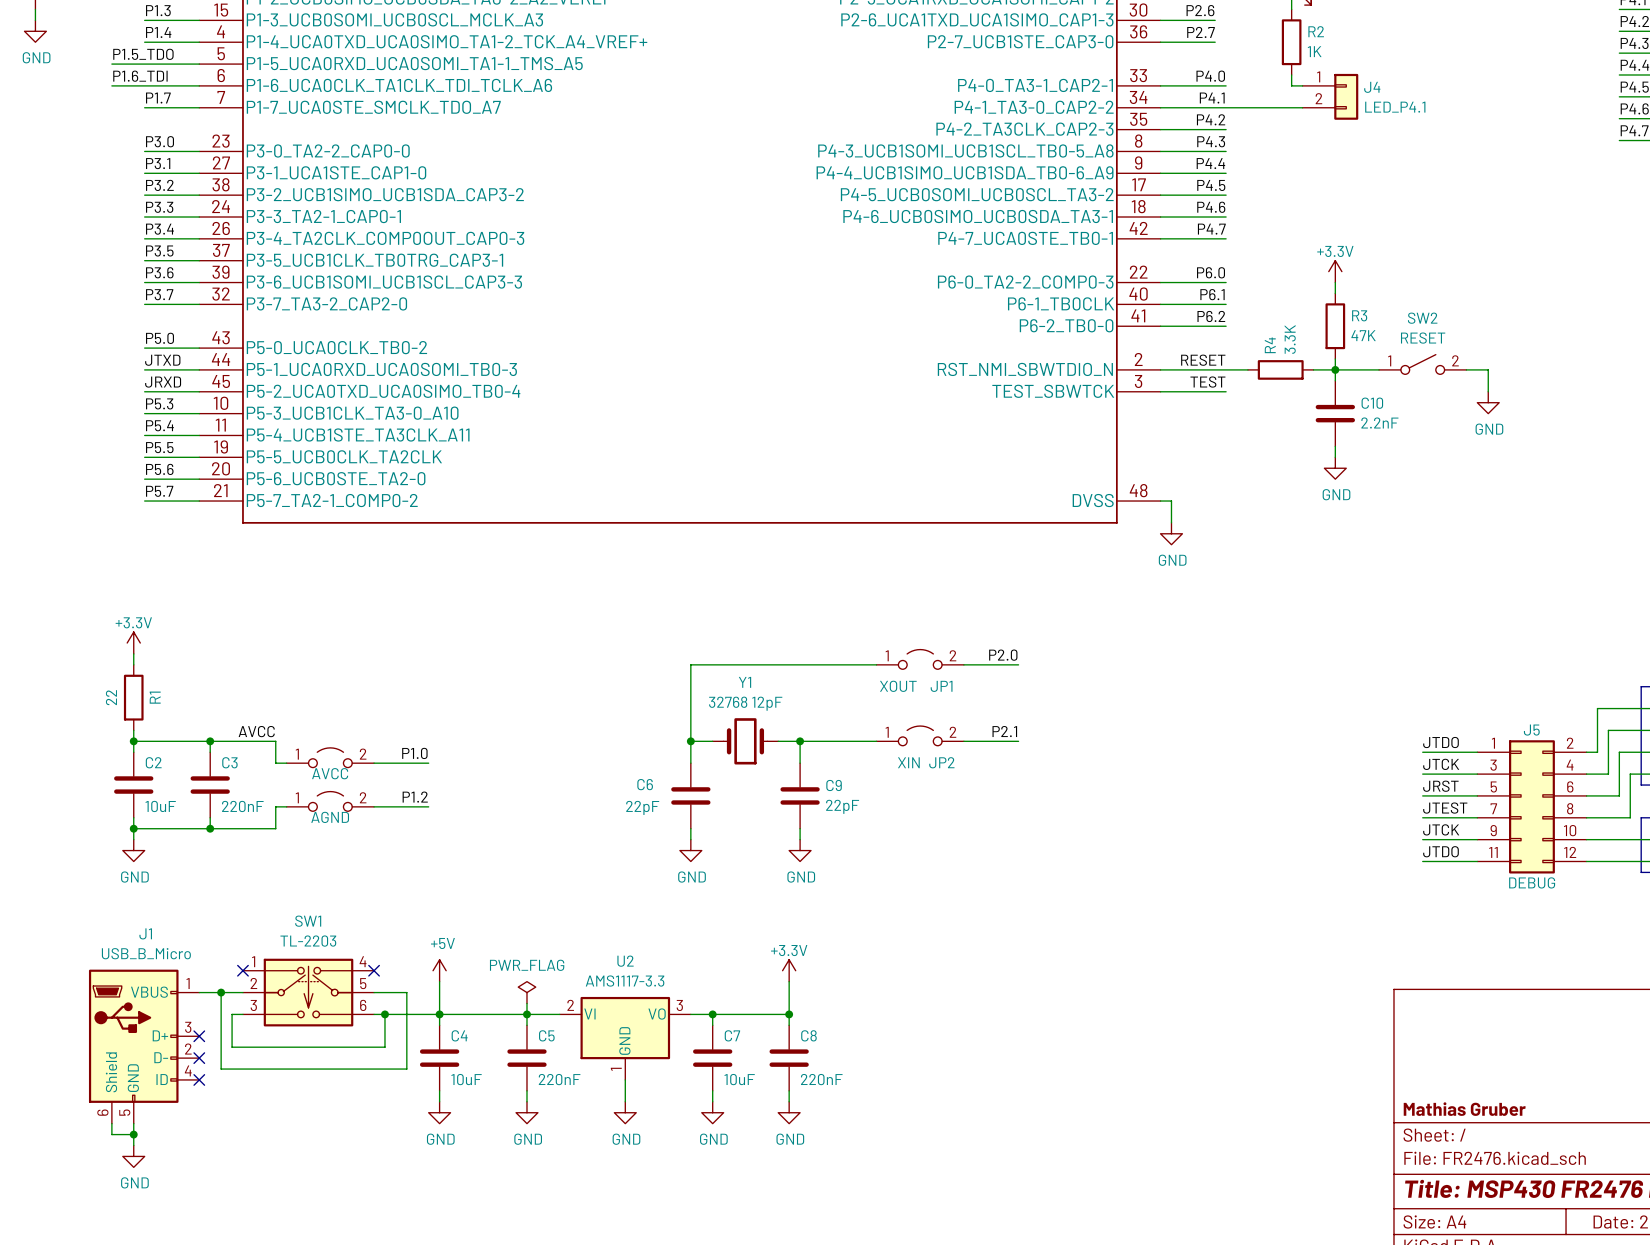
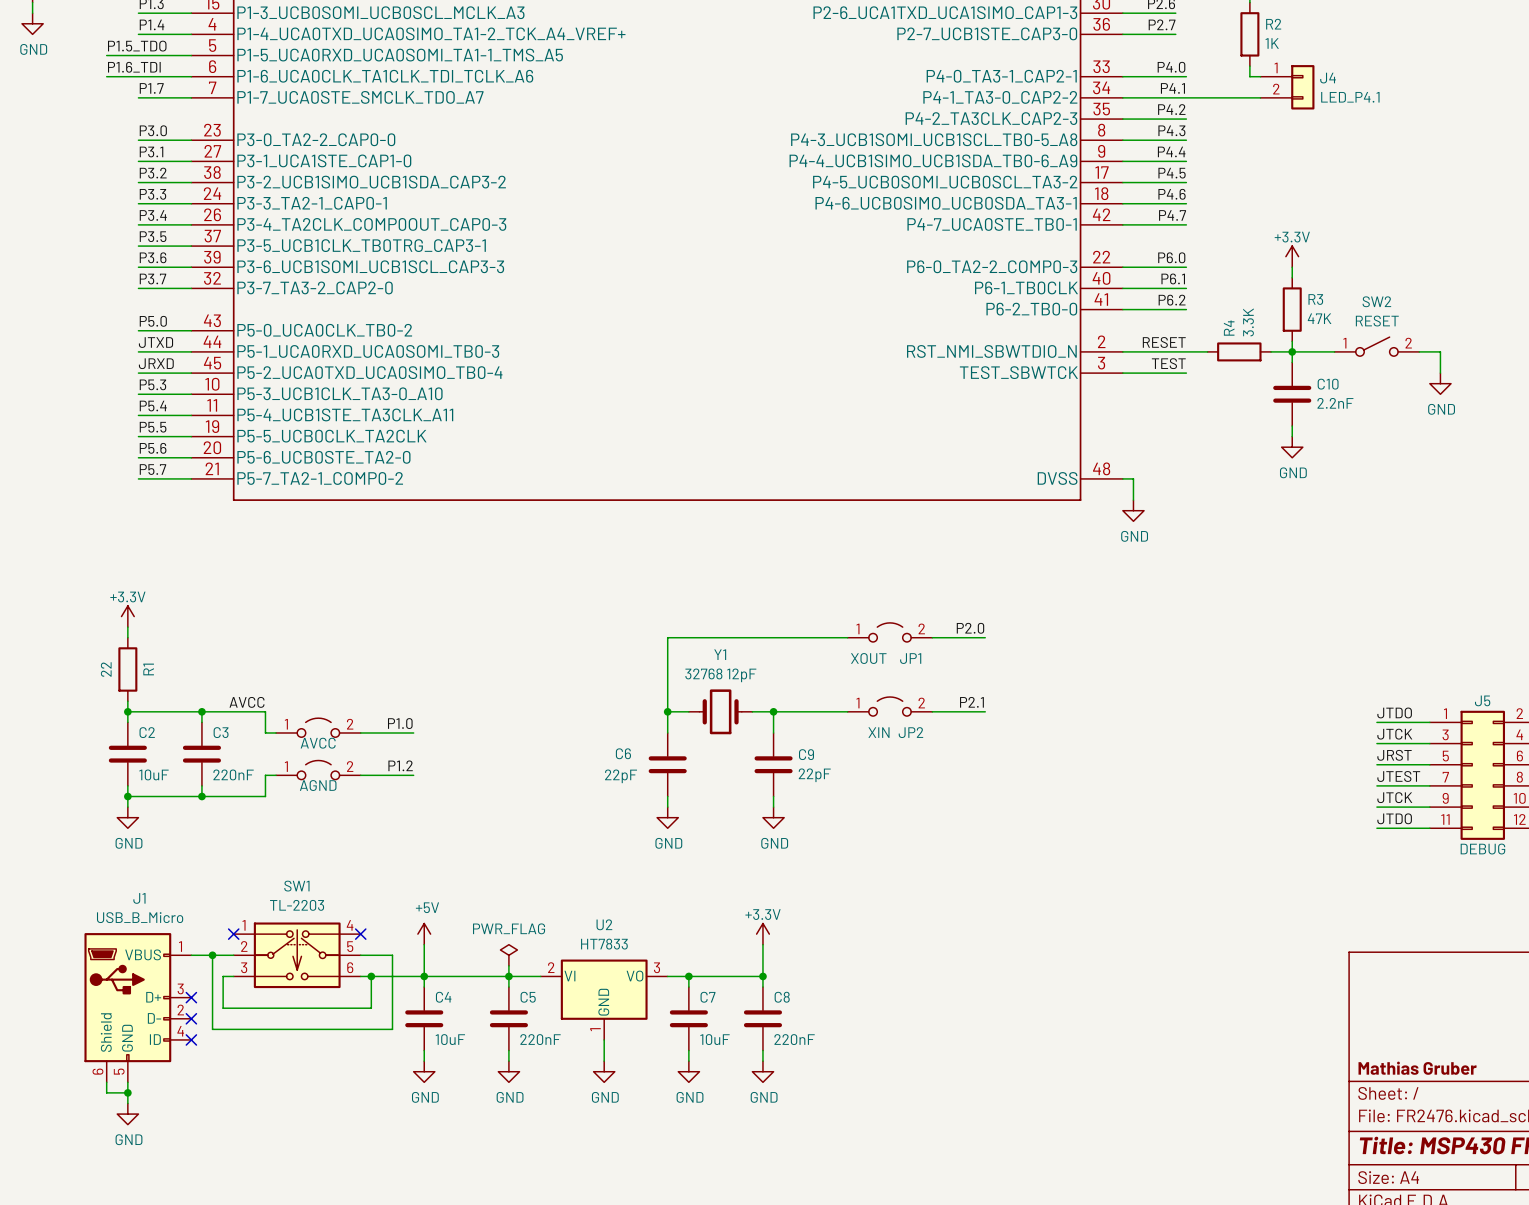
U2 value: AMS1117-3.3 (625, 981) -> HT7833 (604, 944)

